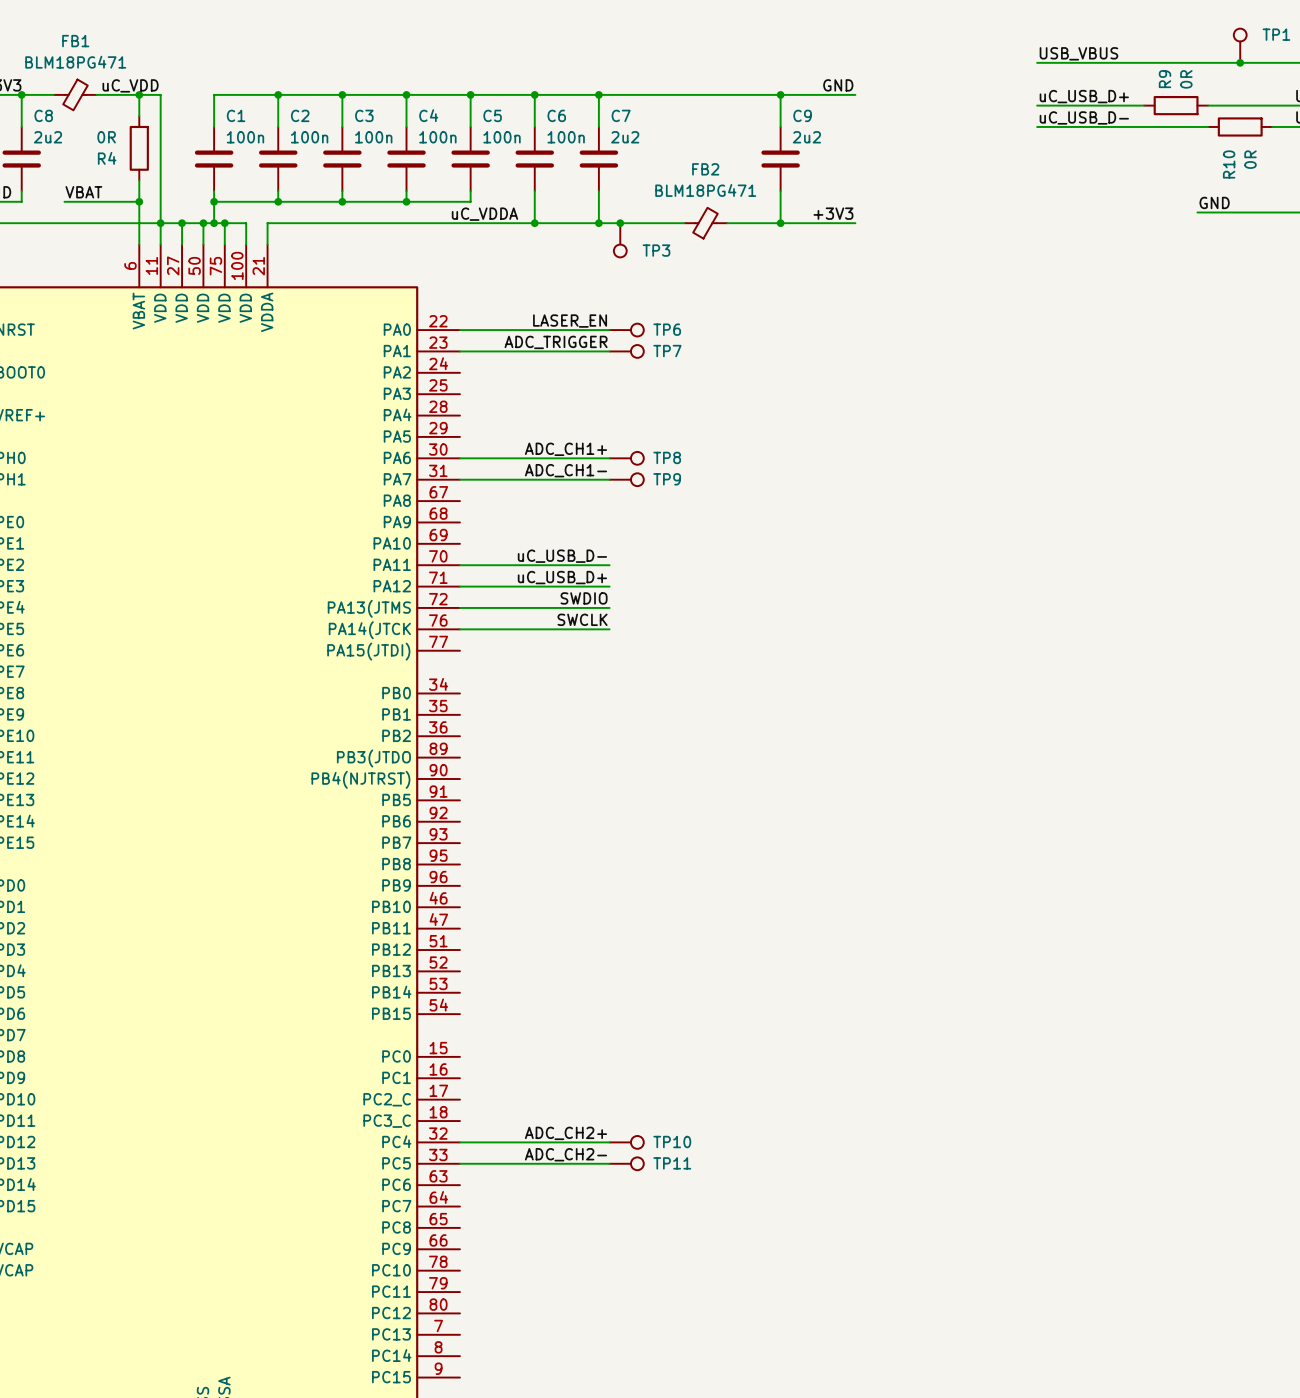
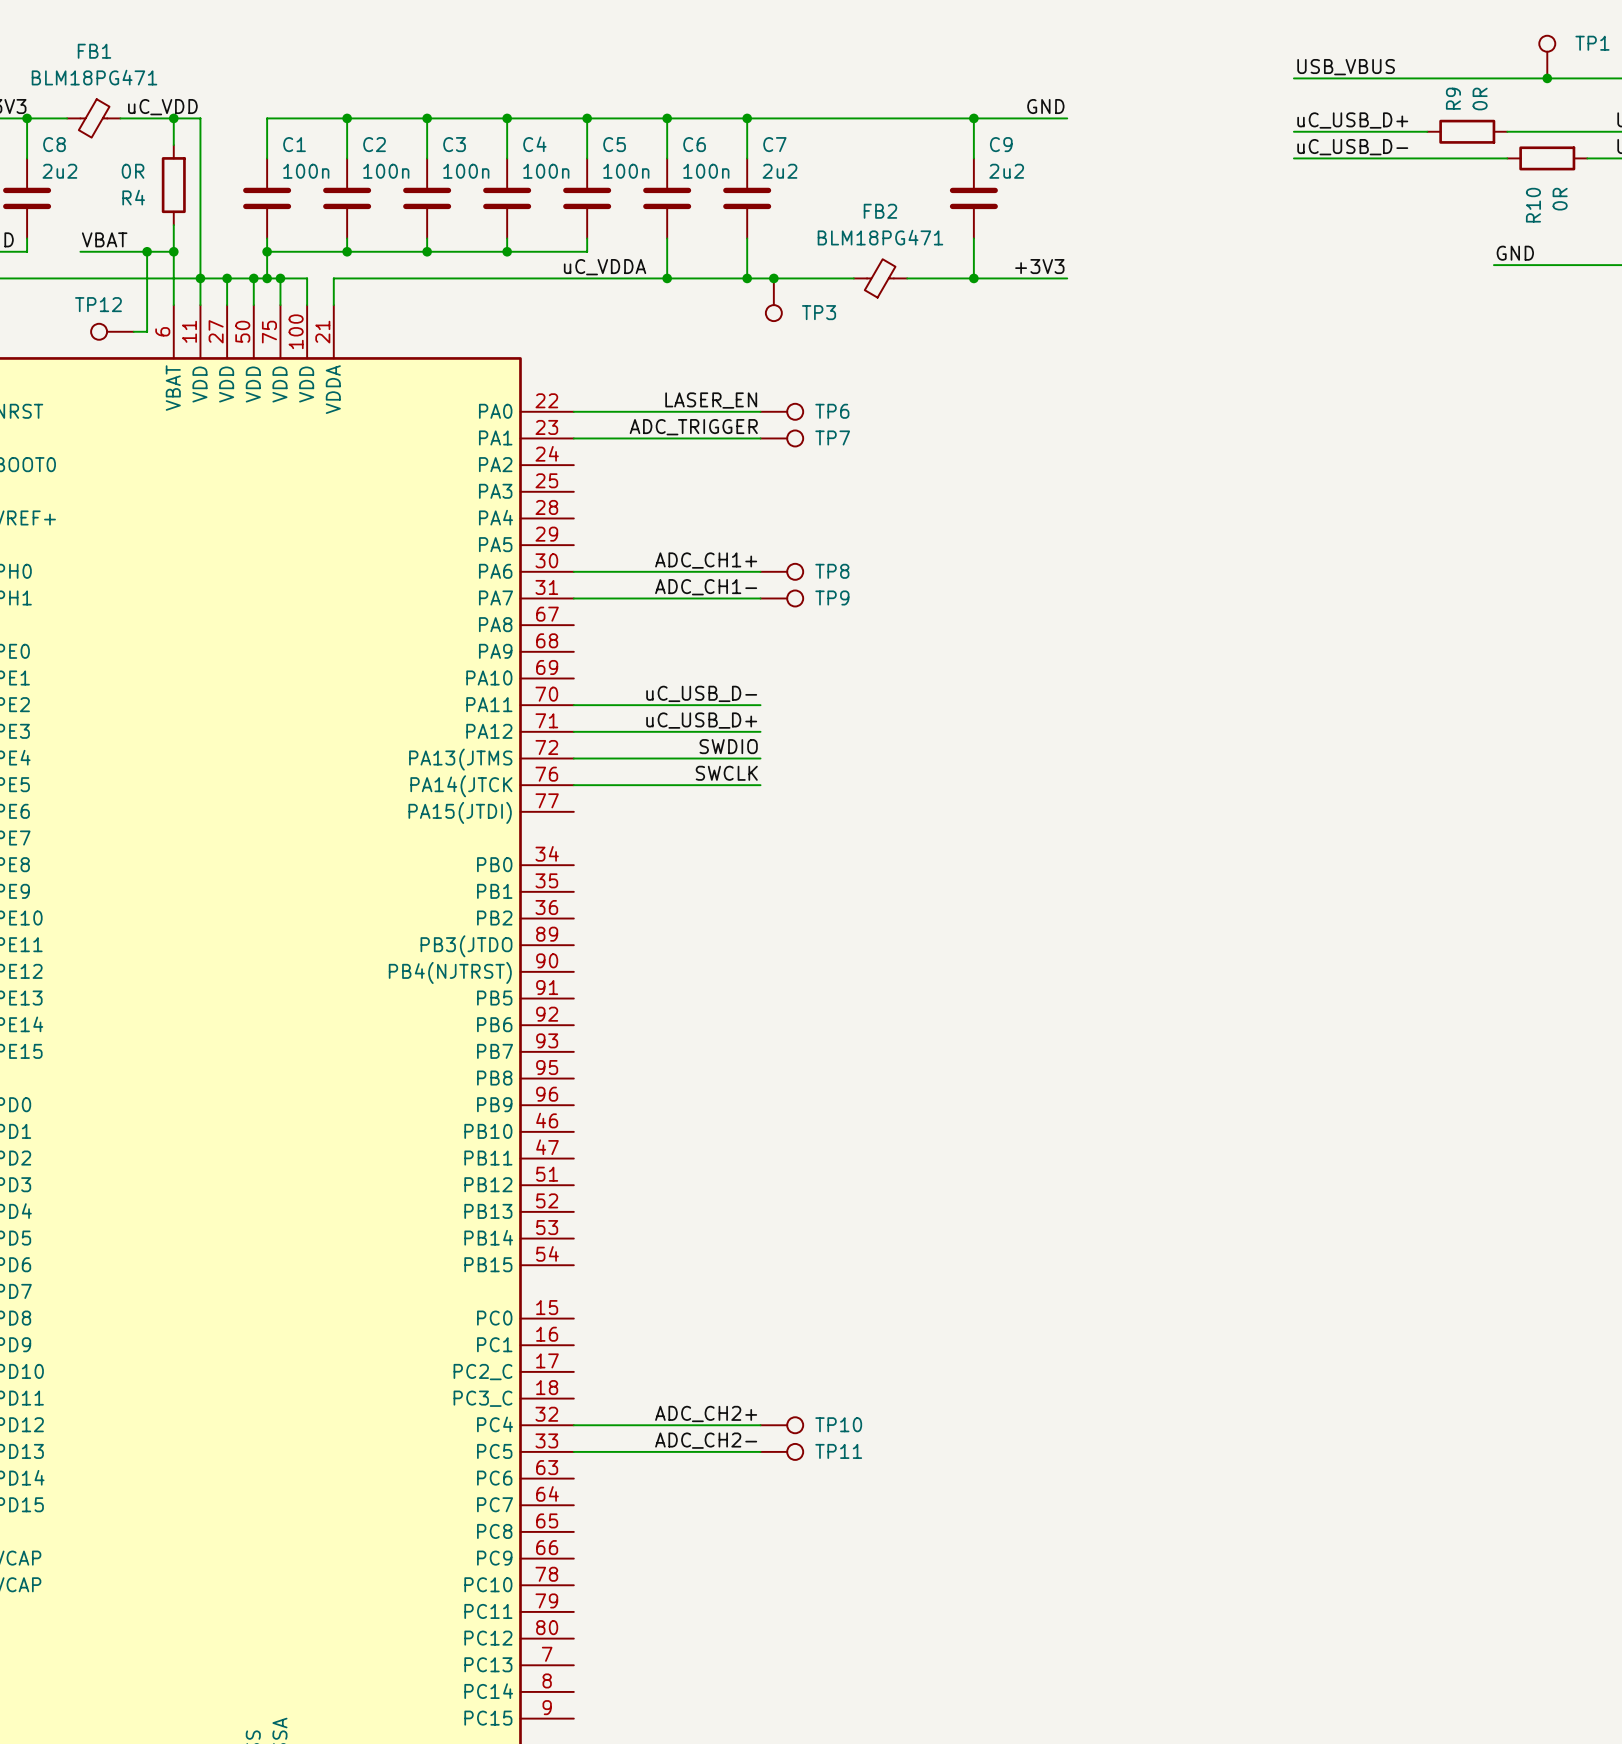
wire: none -> (147, 251) (147, 331) (133, 331)
junction: none -> (147, 251)
TP12: none -> (112, 331)

